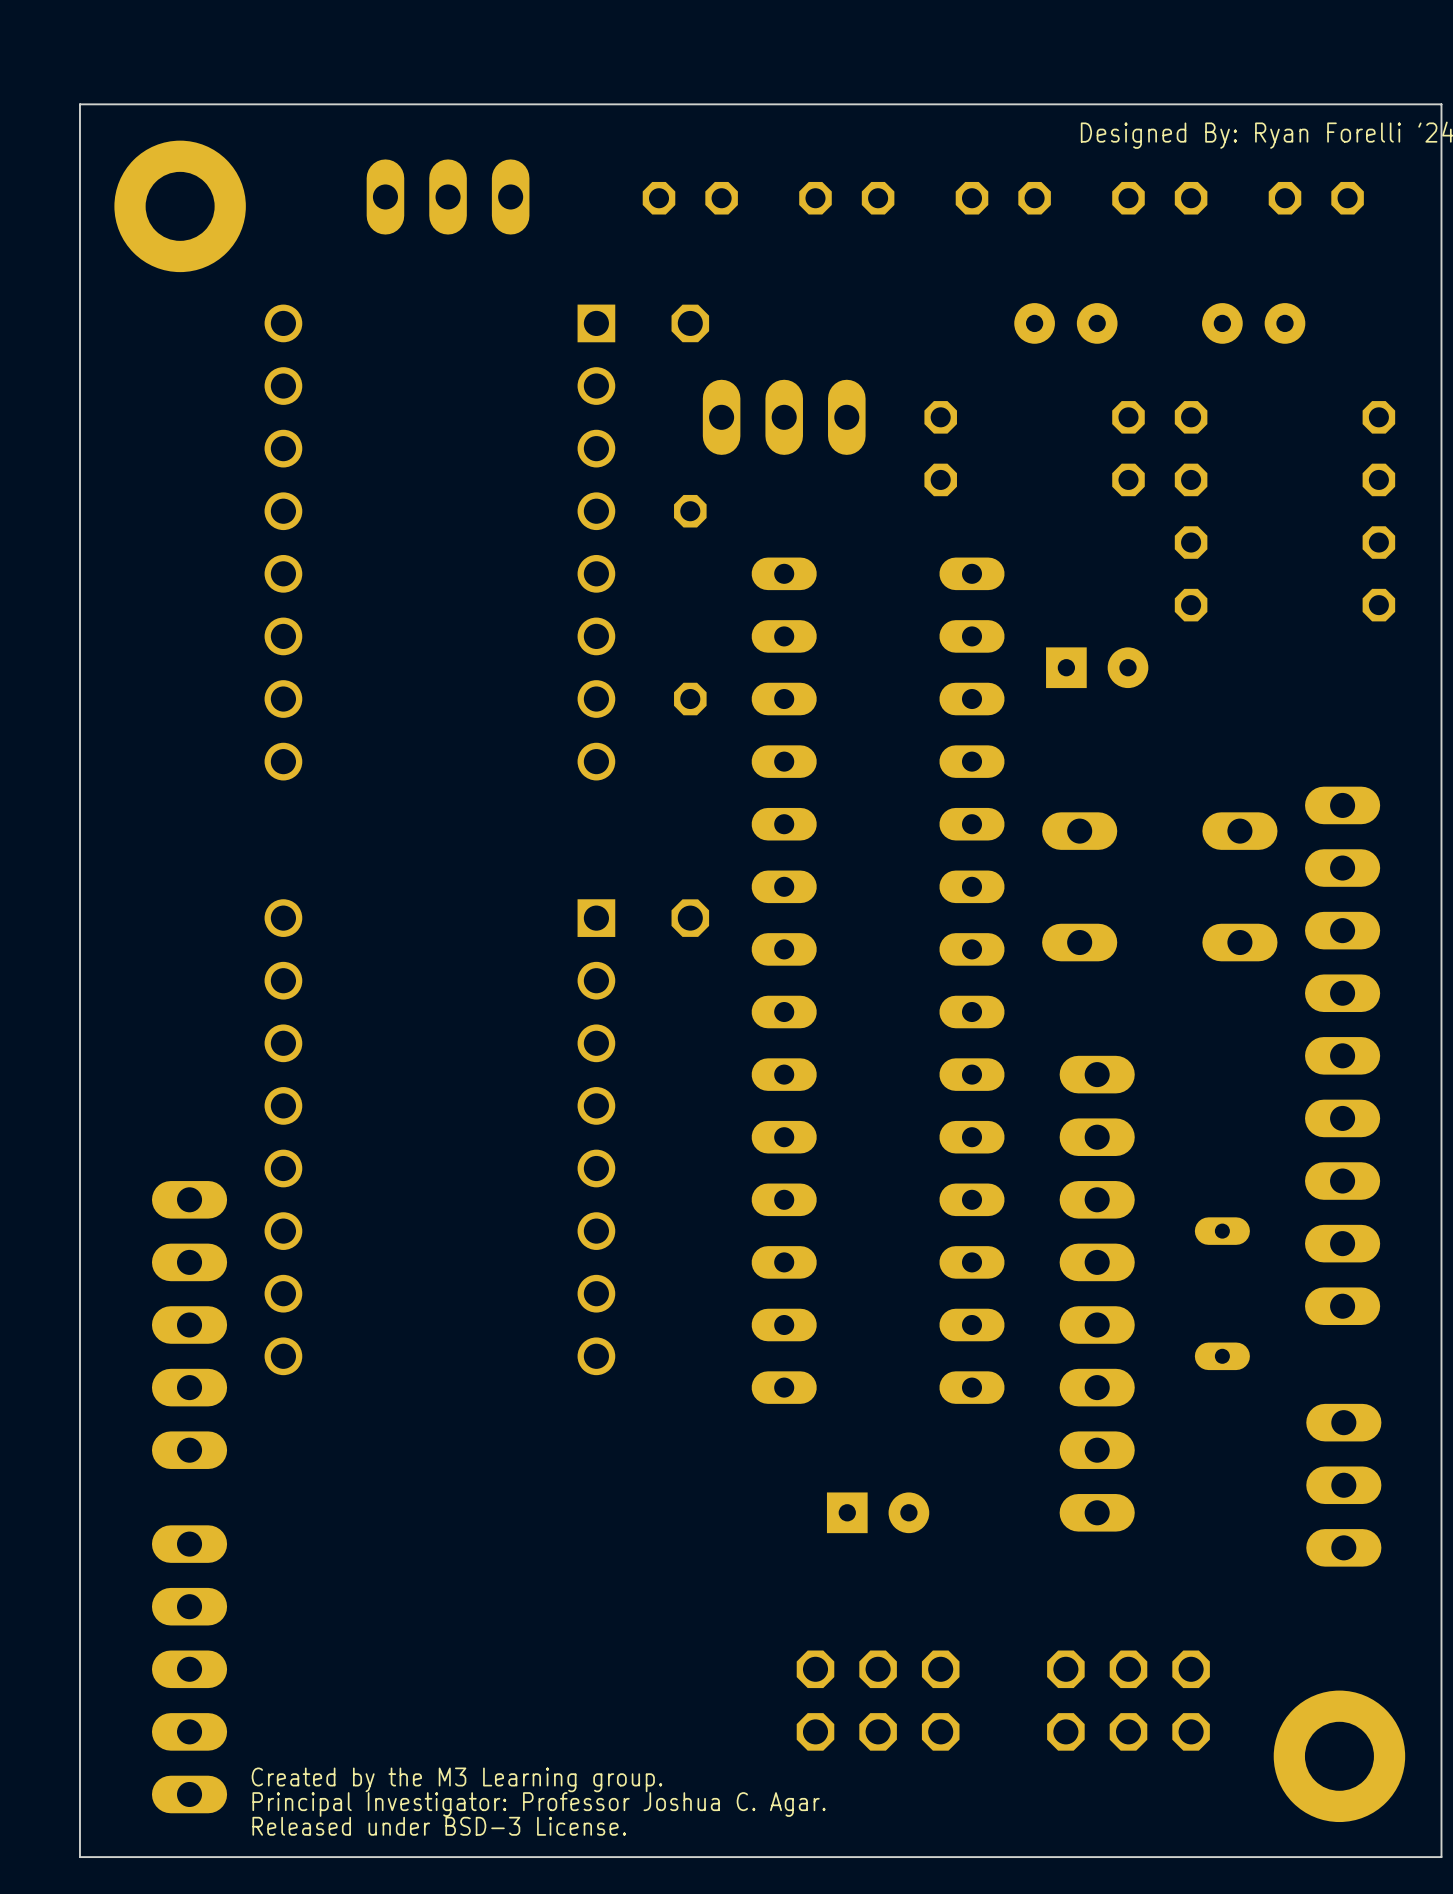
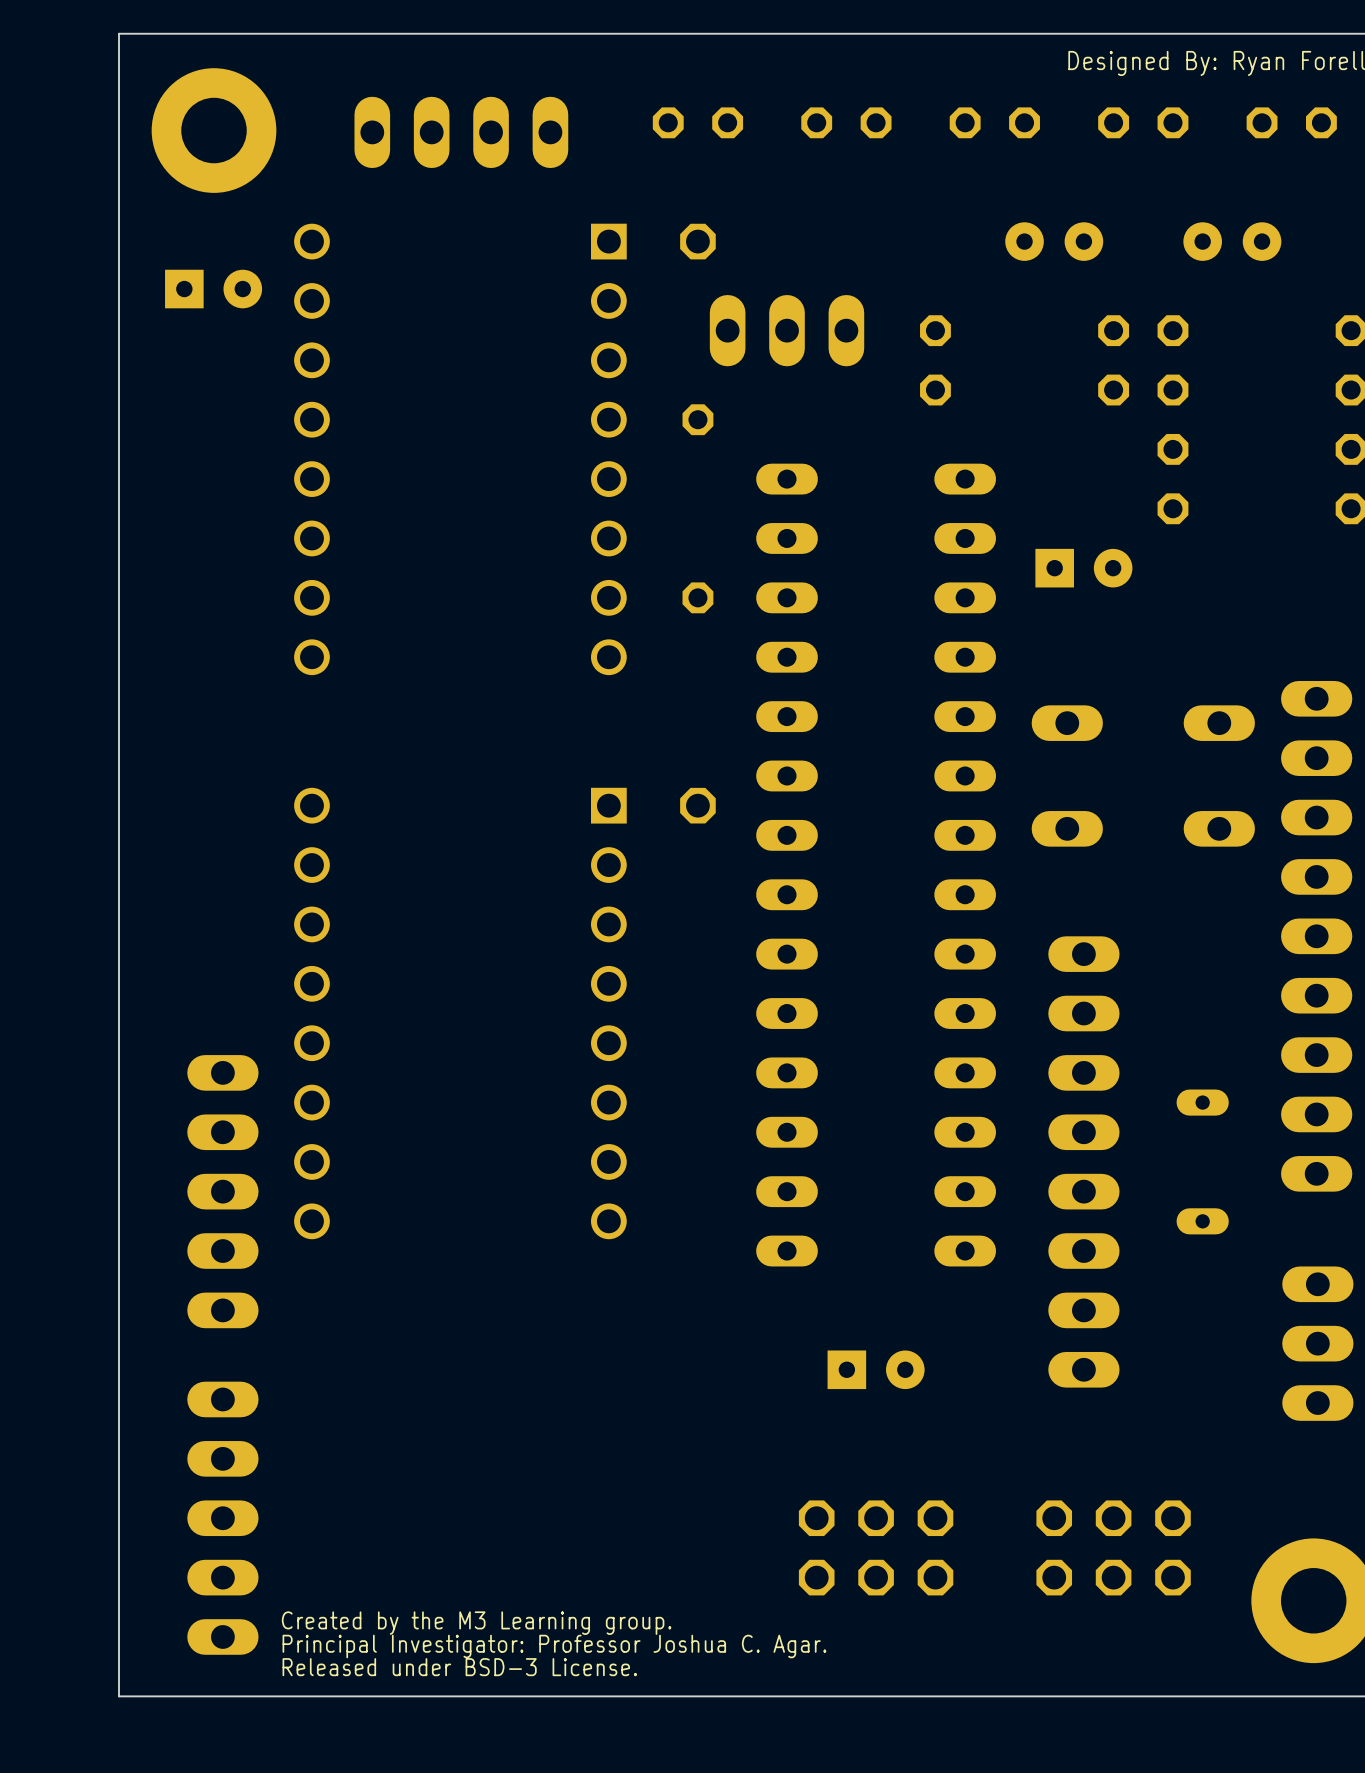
part footprint: [366, 159, 530, 235] -> [354, 96, 569, 169]
part: none -> (213, 289)

